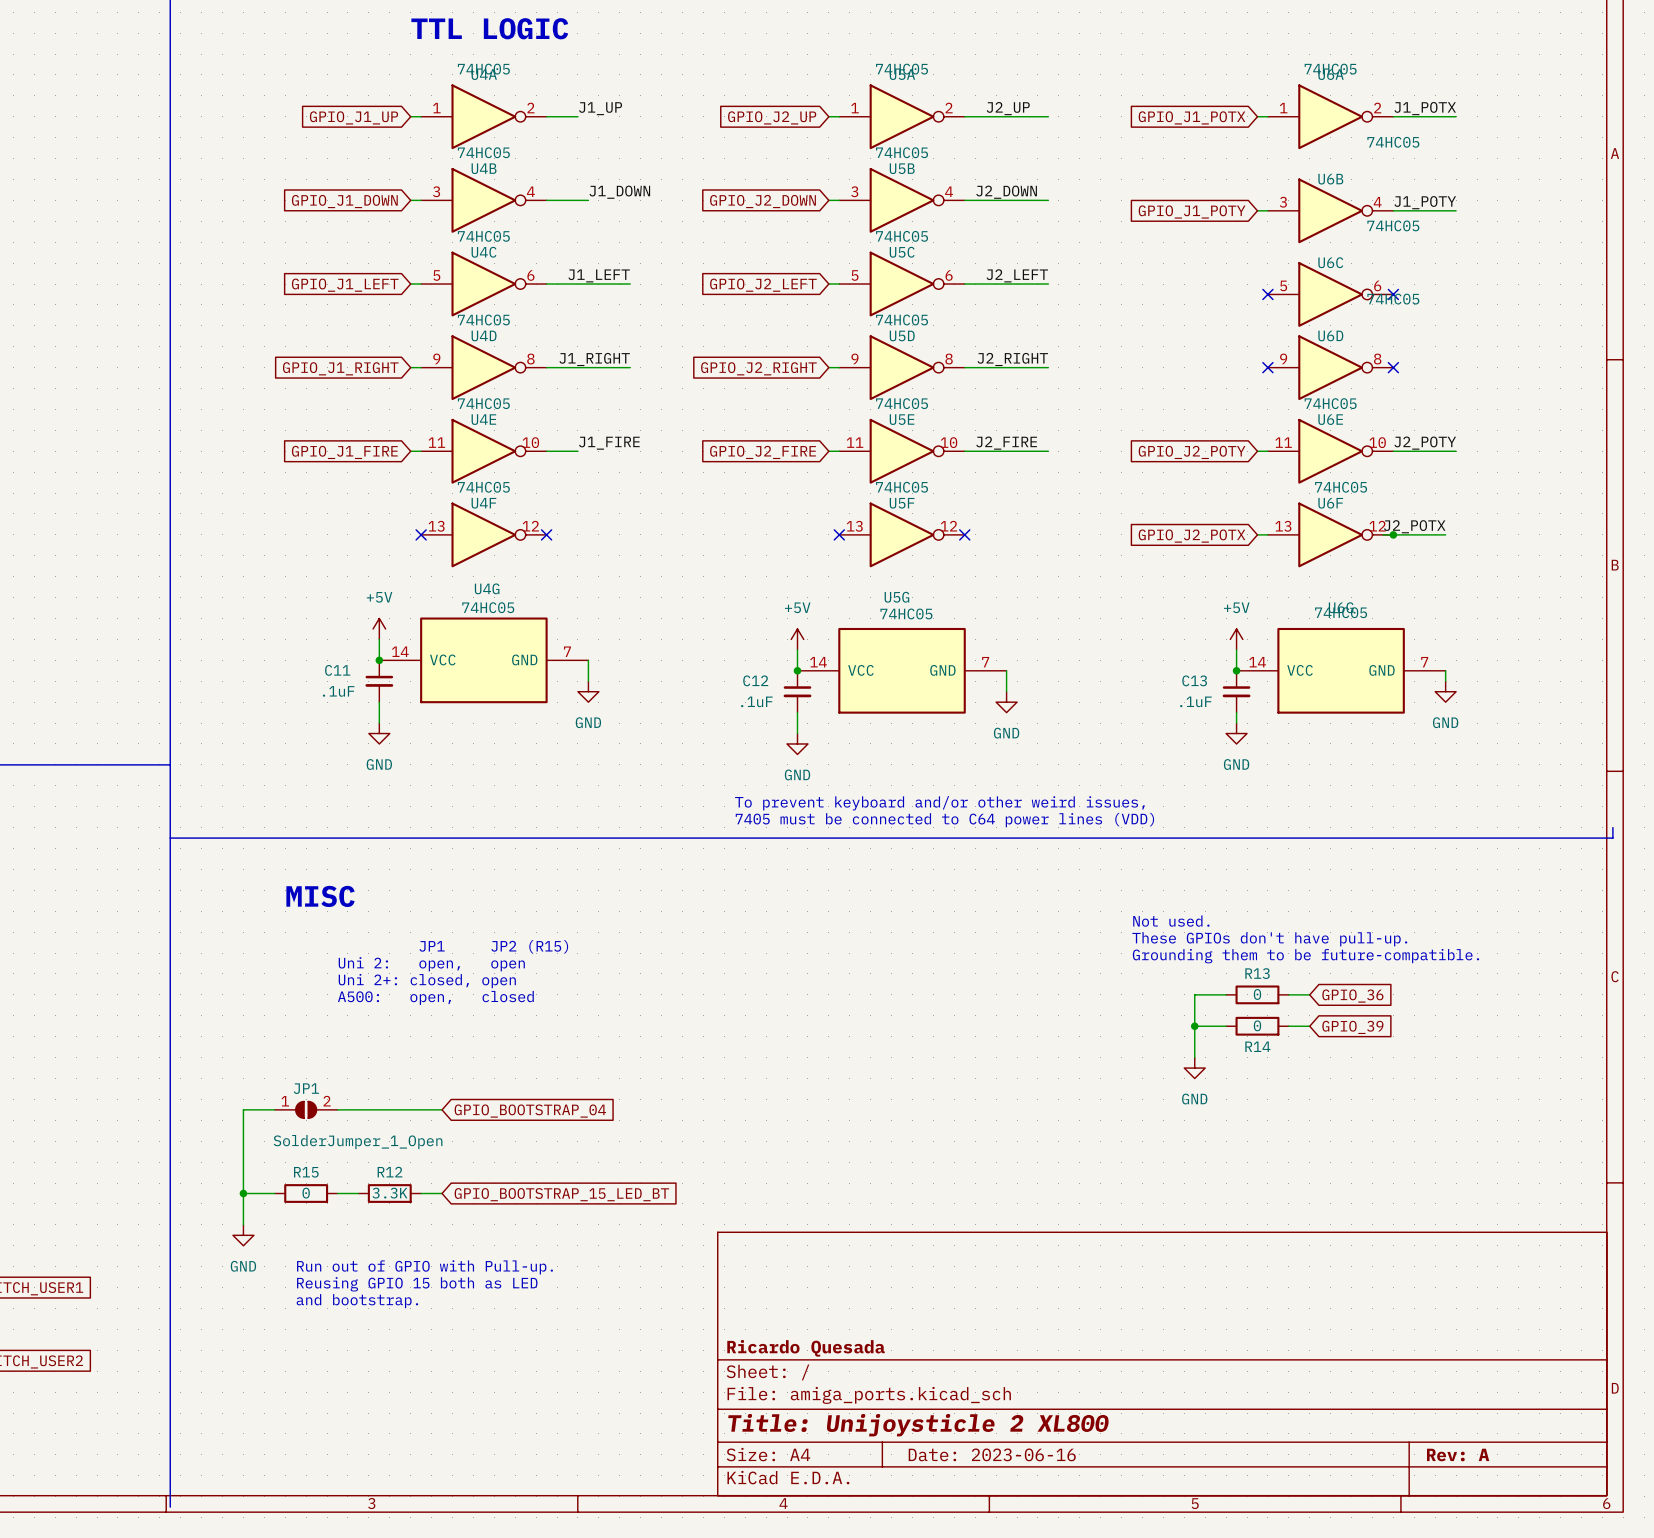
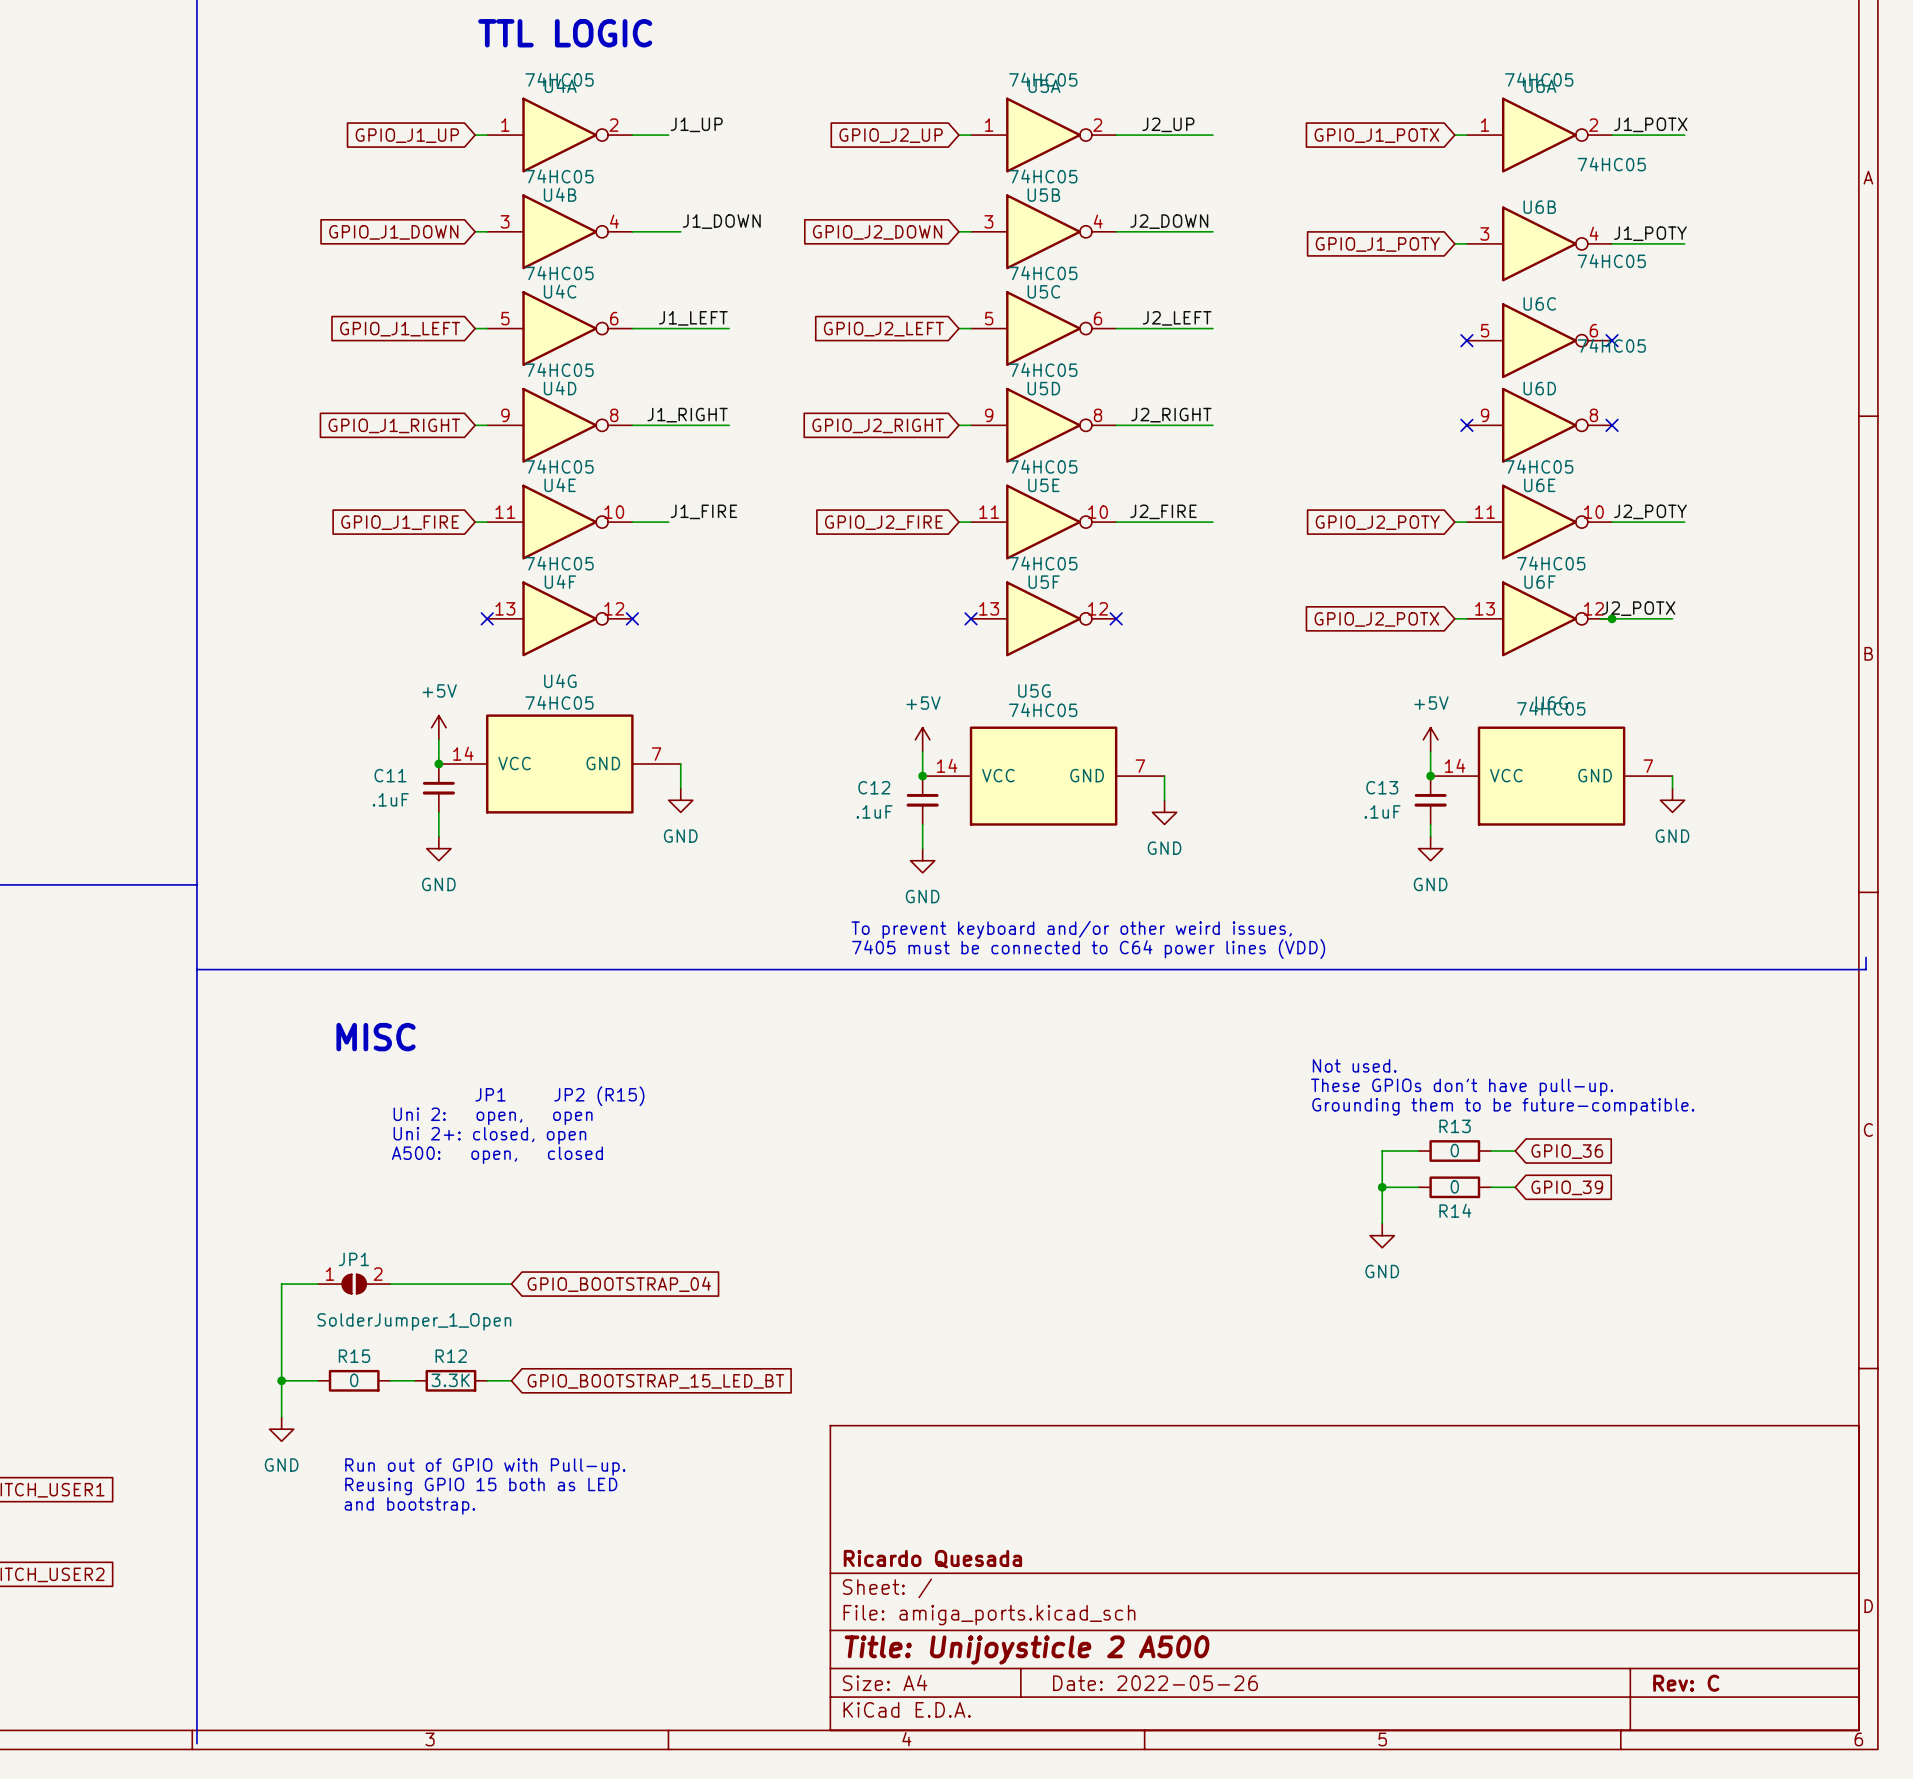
title block: Title: Unijoysticle 2 XL800 (918, 1425) -> Title: Unijoysticle 2 A500 (1027, 1650)
title block: Date: 2023-06-16 (992, 1454) -> Date: 2022-05-26 (1155, 1683)
title block: Rev: A (1458, 1455) -> Rev: C (1686, 1683)

